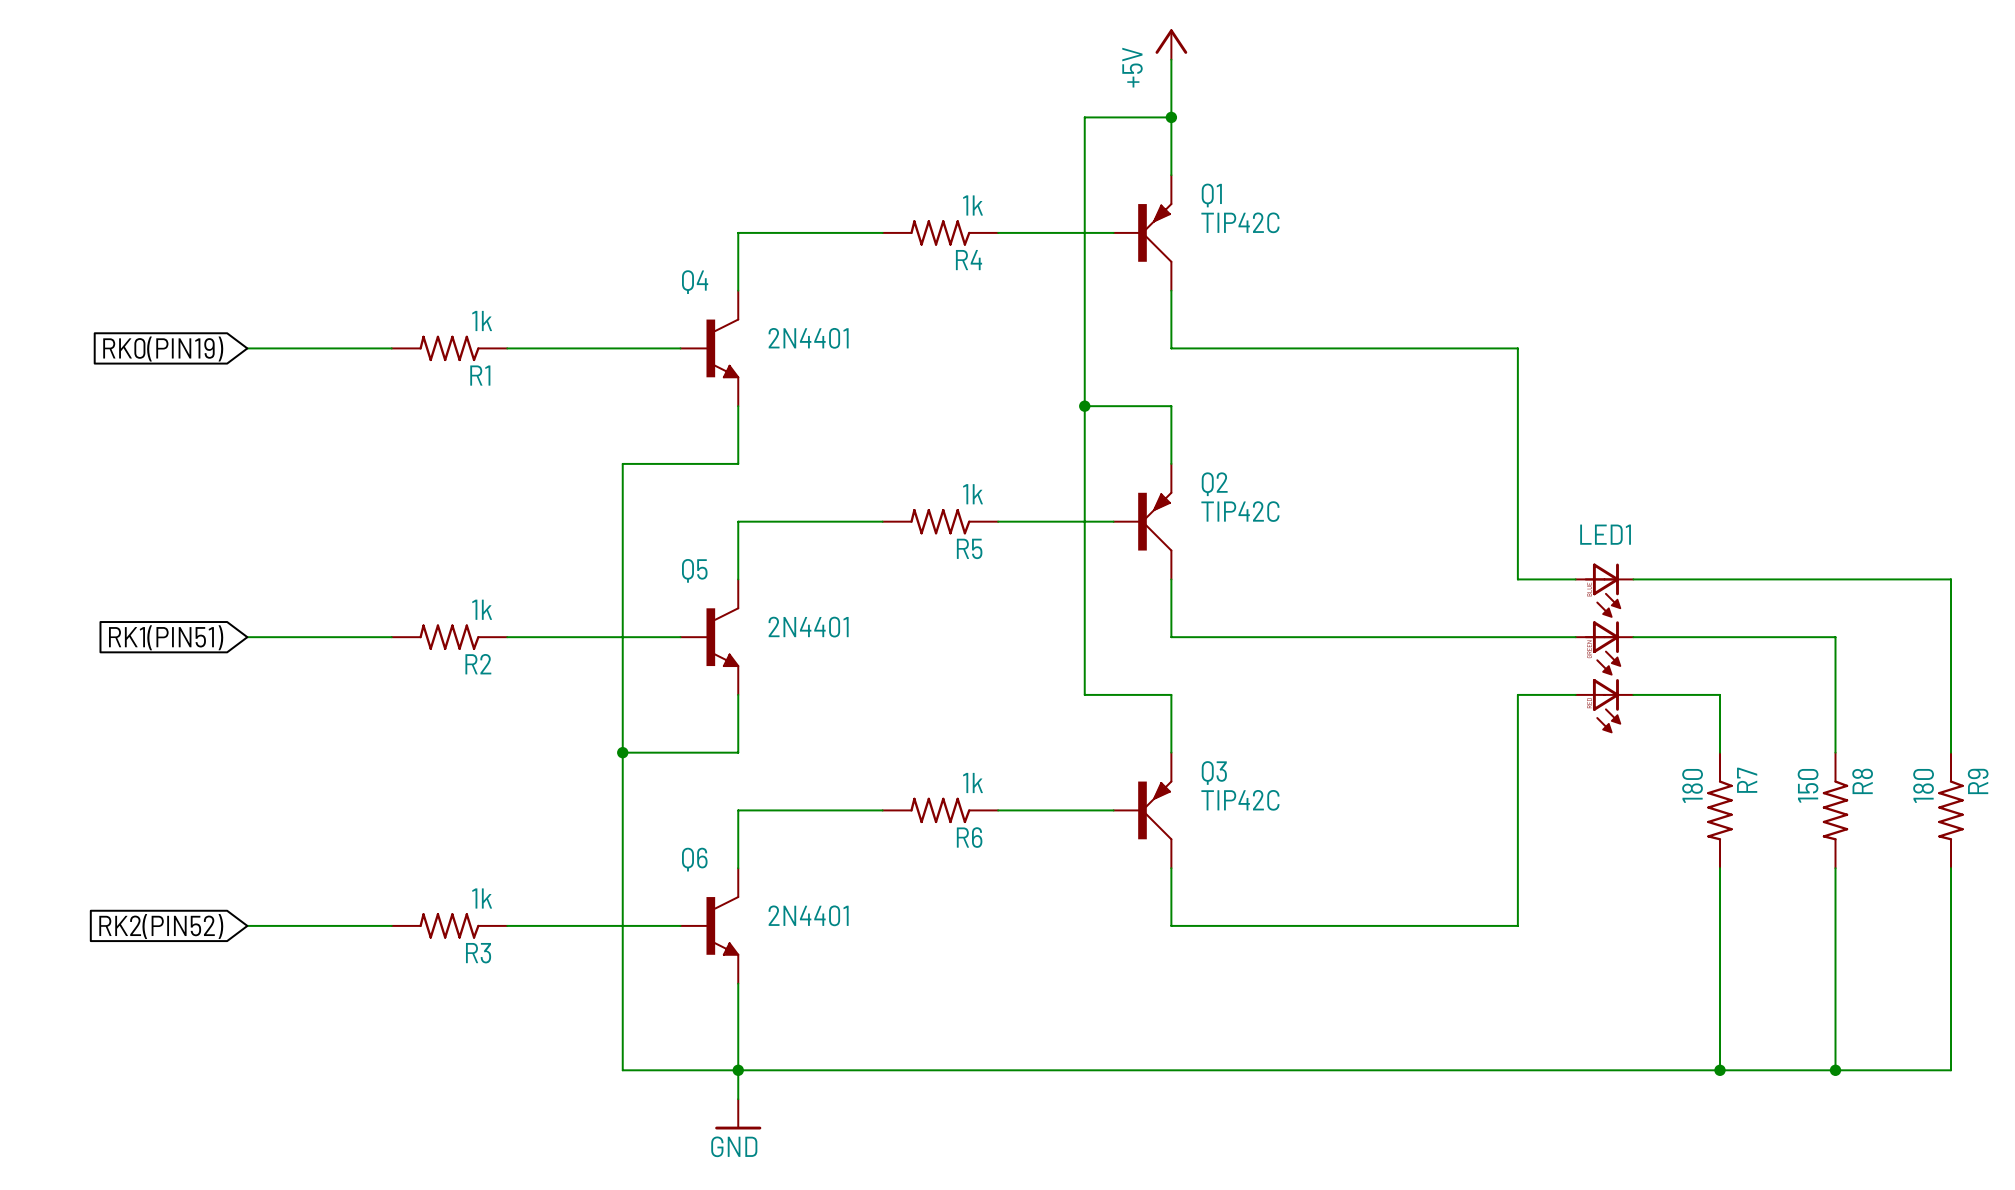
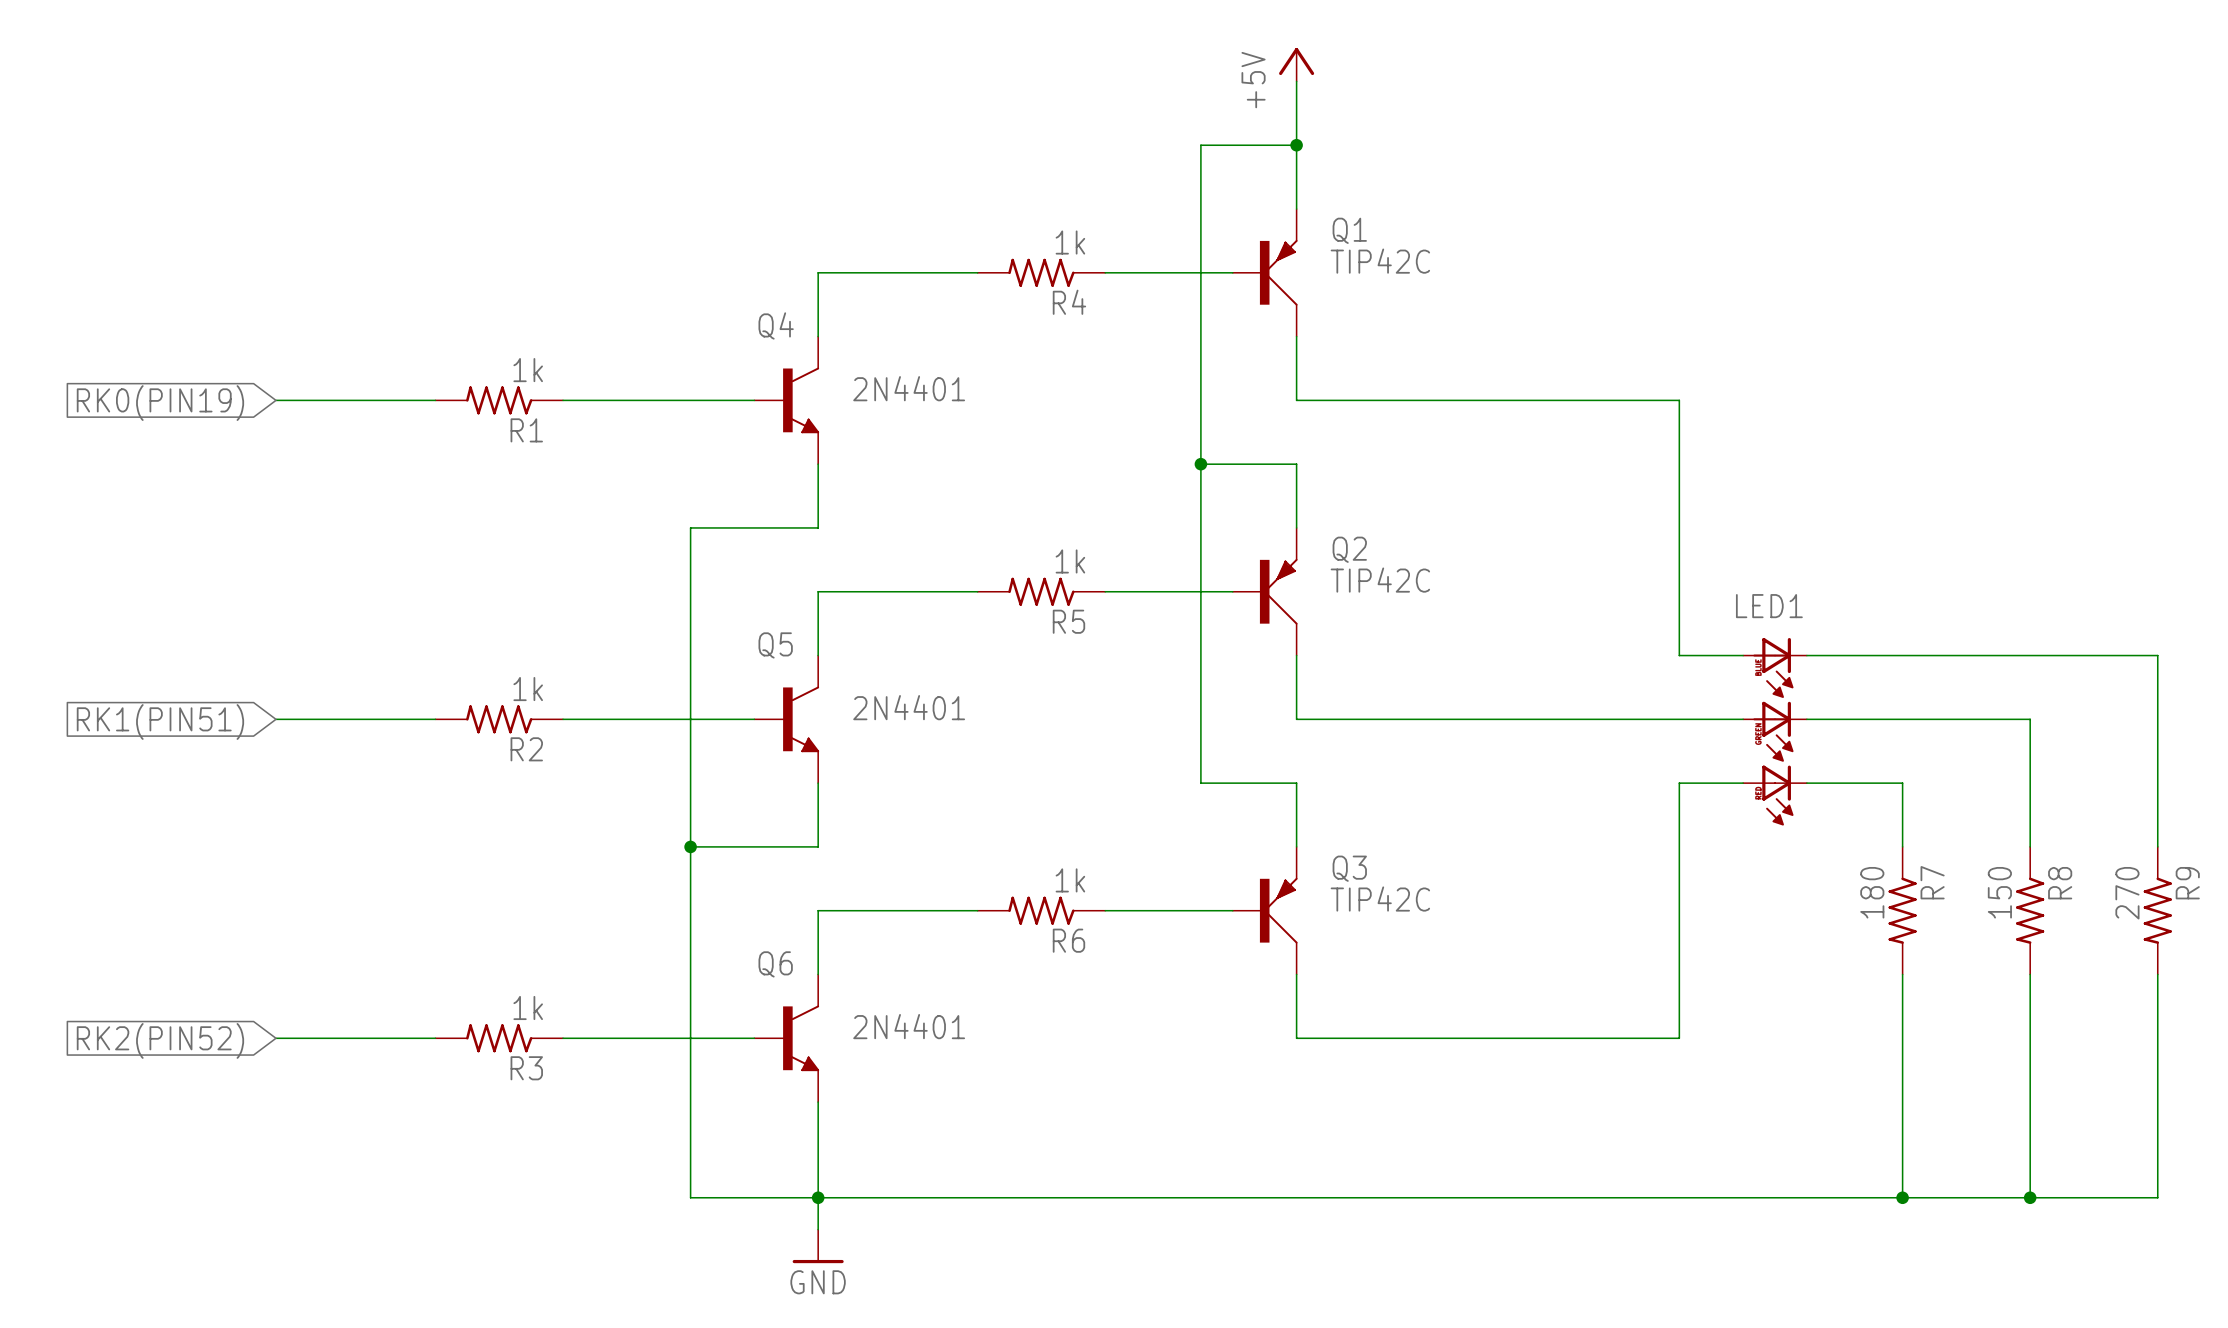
R9 value: 180 (1923, 785) -> 270 (2127, 893)

